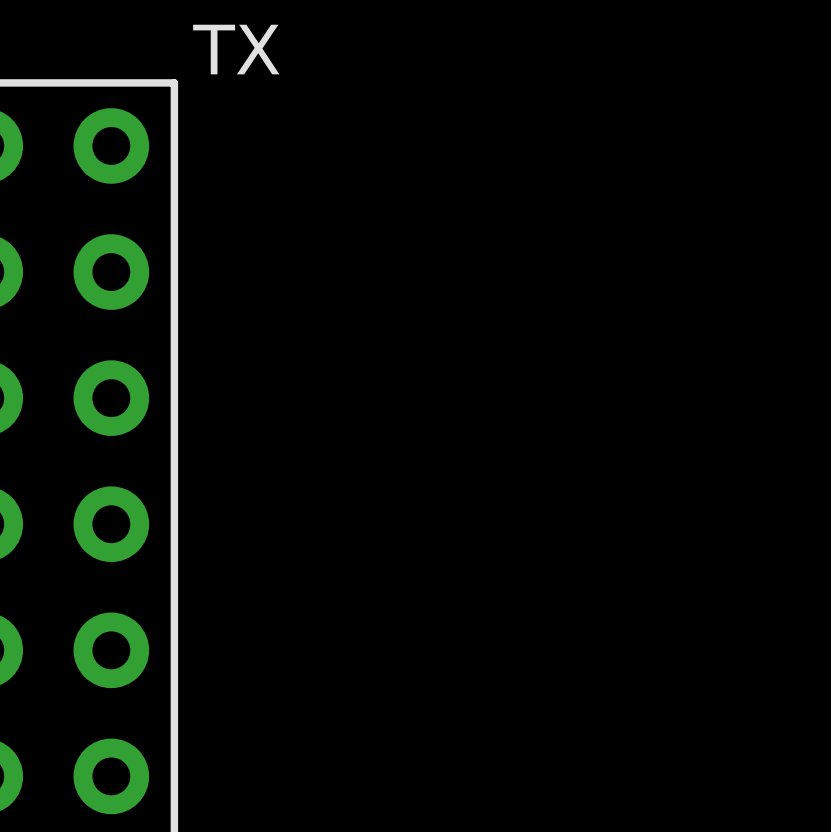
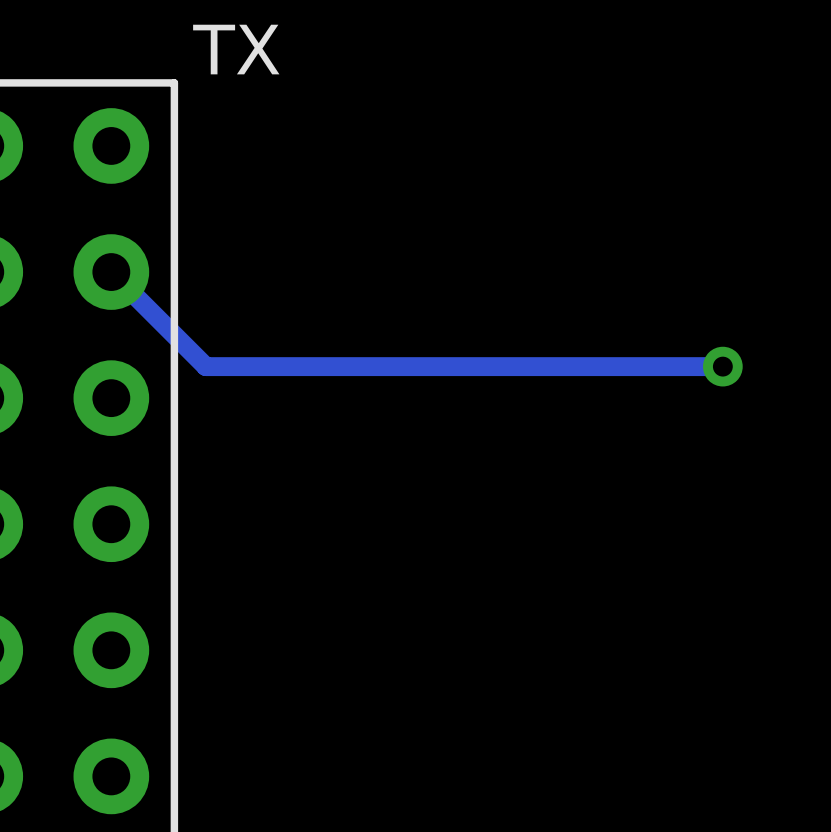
bottom track: none -> (111, 272) (205, 366) (722, 366)
via: none -> (722, 366)

